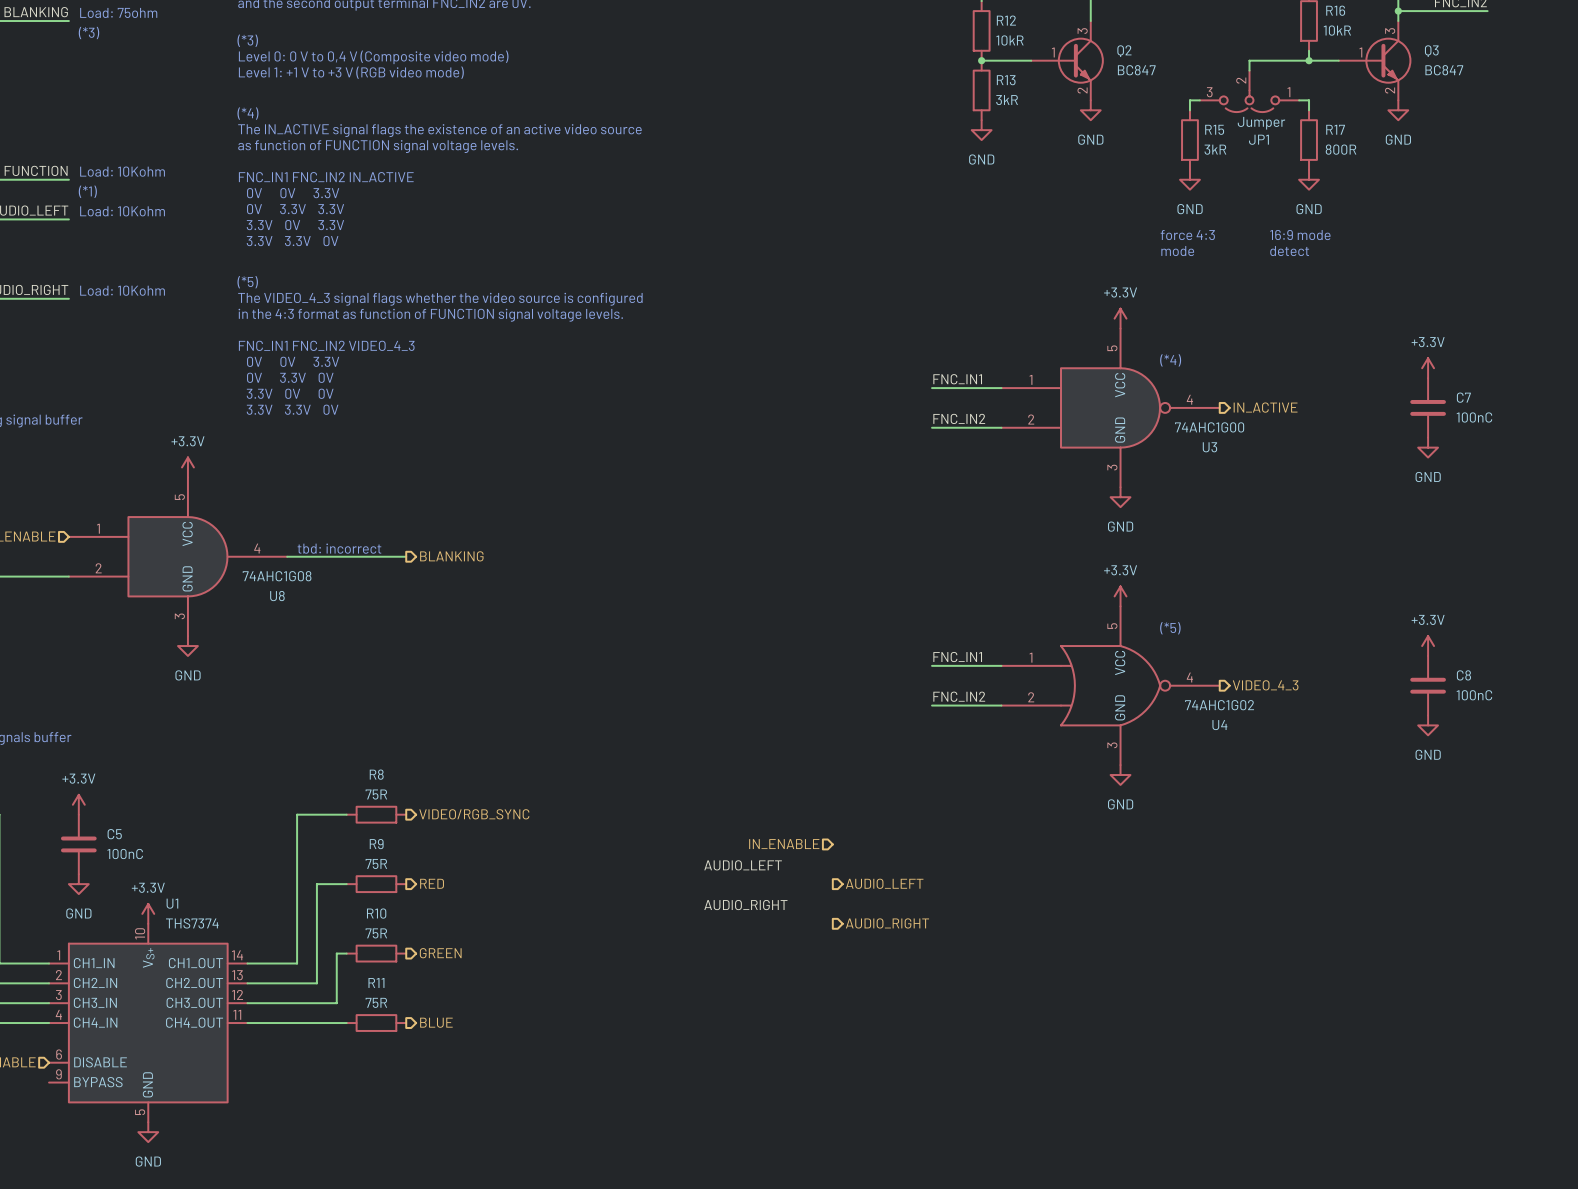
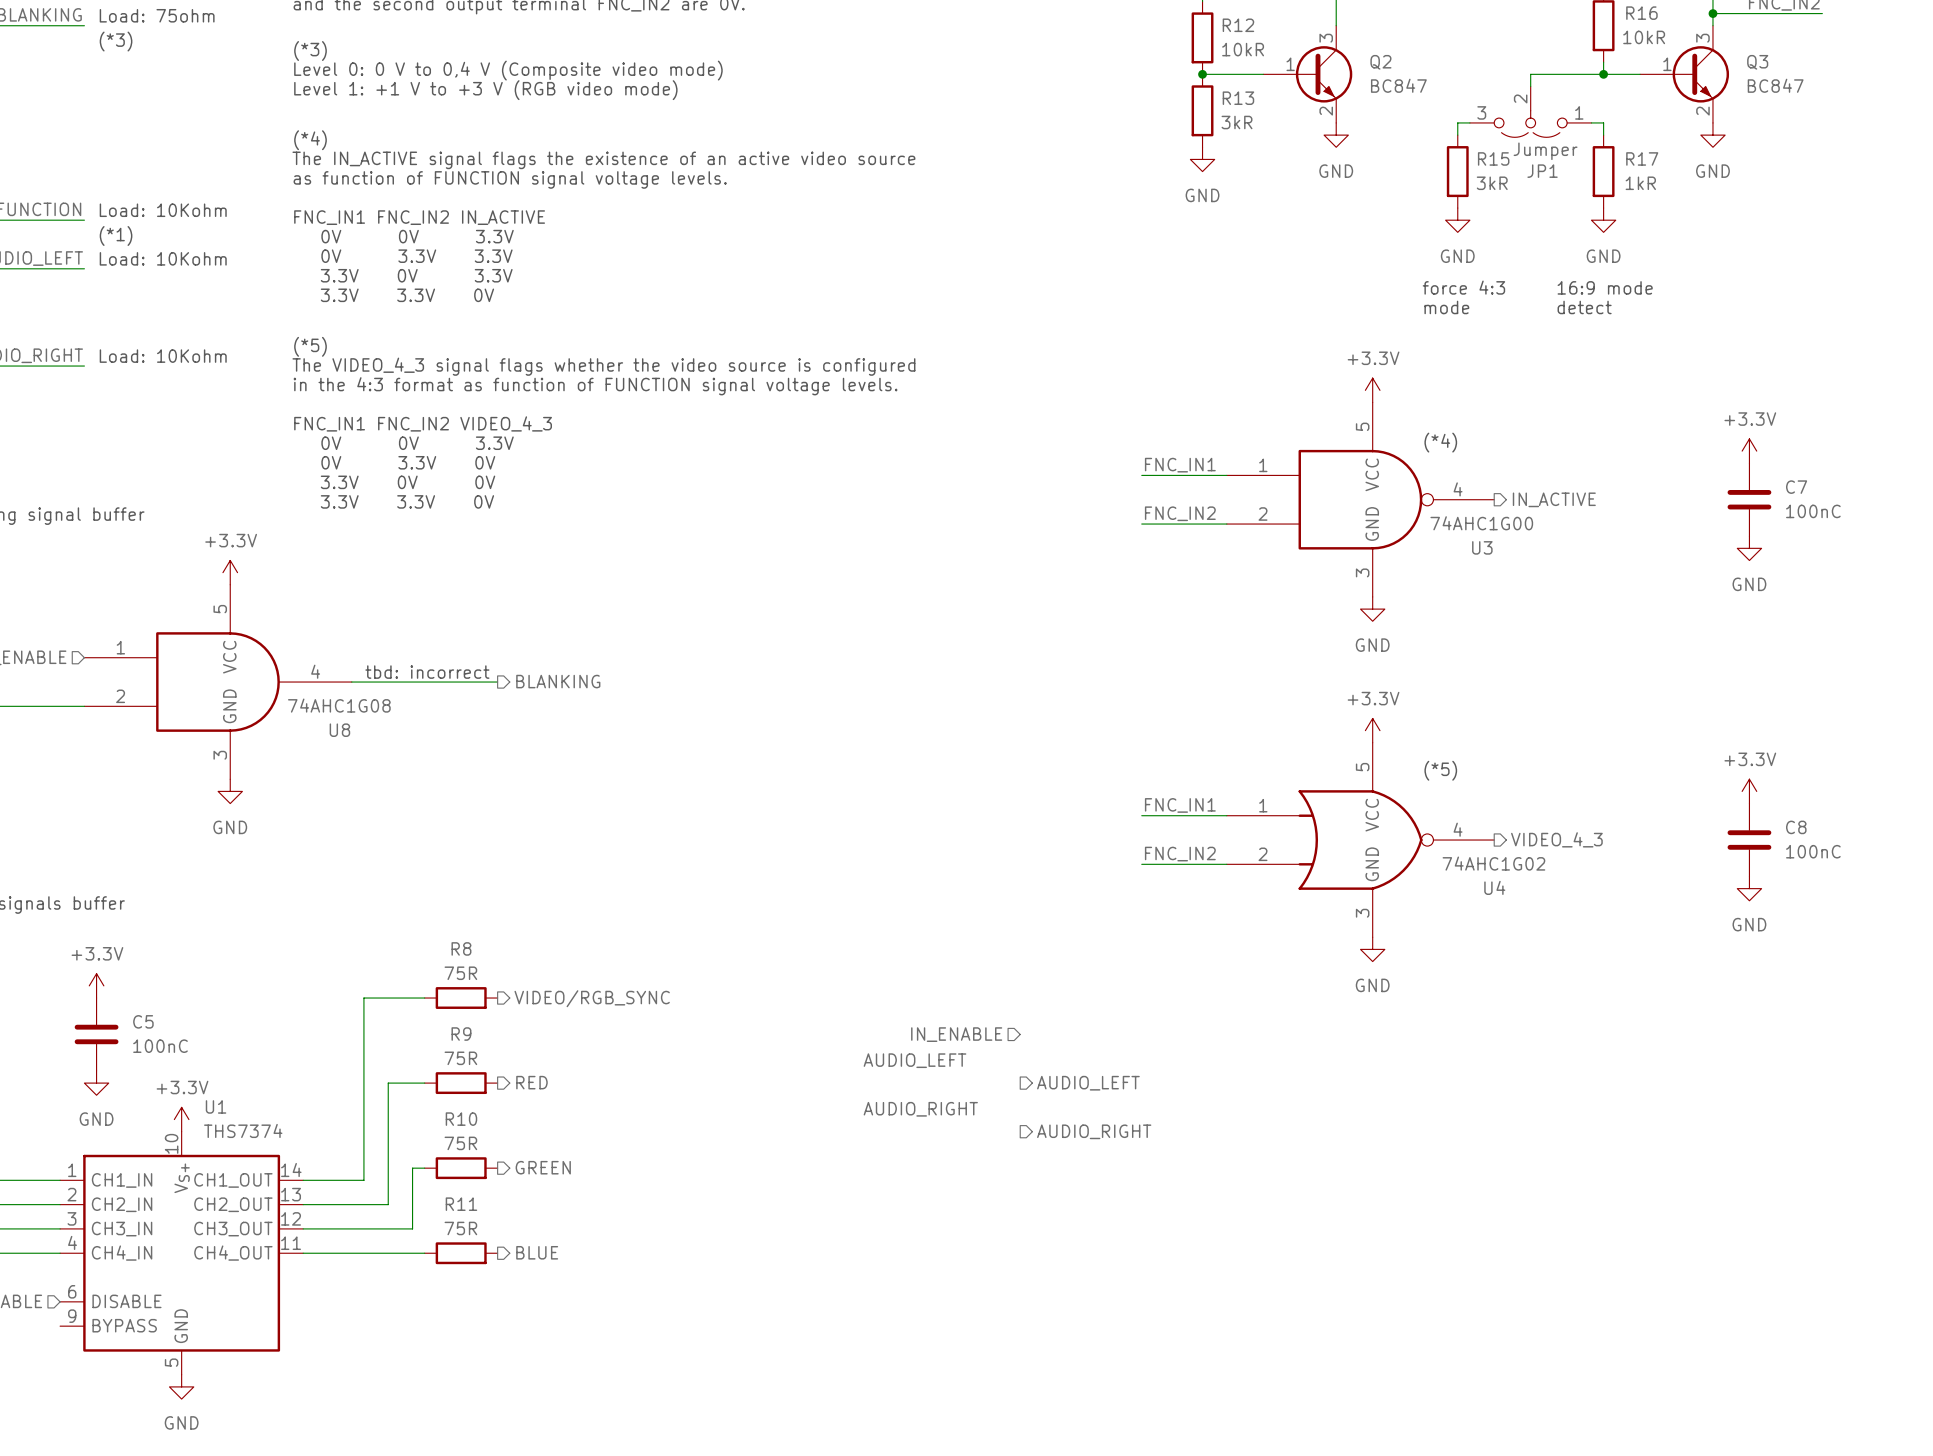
R17 value: 800R (1341, 149) -> 1kR (1640, 183)

